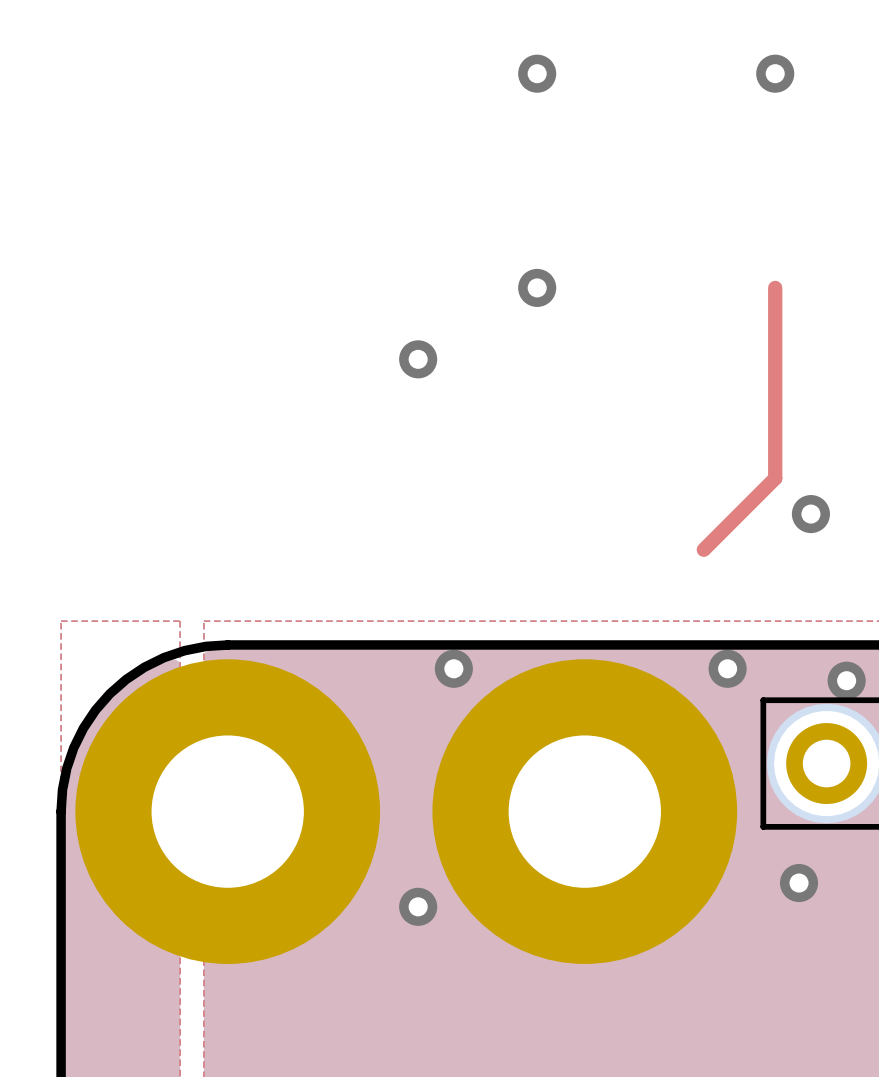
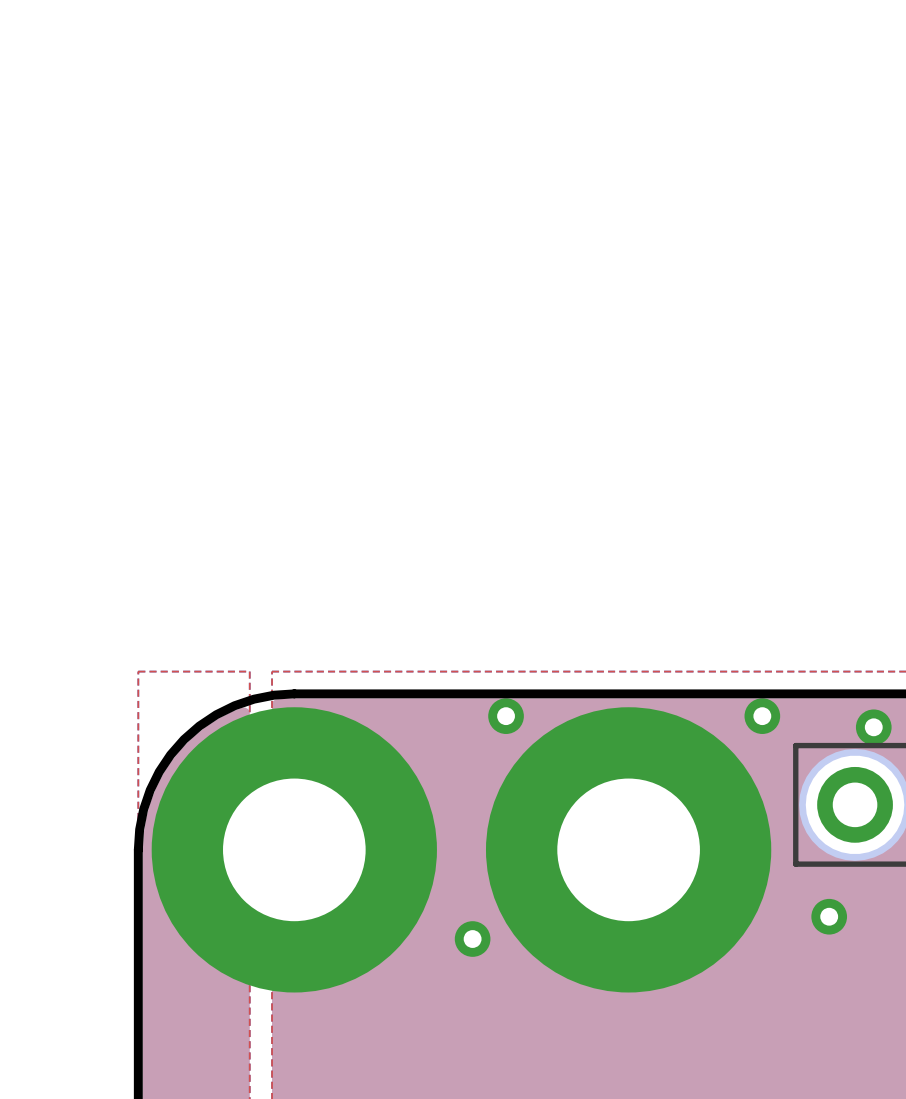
via: (537, 73) -> none
via: (775, 73) -> none
via: (537, 287) -> none
top track: (775, 287) (775, 478) (703, 549) -> none
via: (418, 359) -> none
via: (810, 514) -> none

